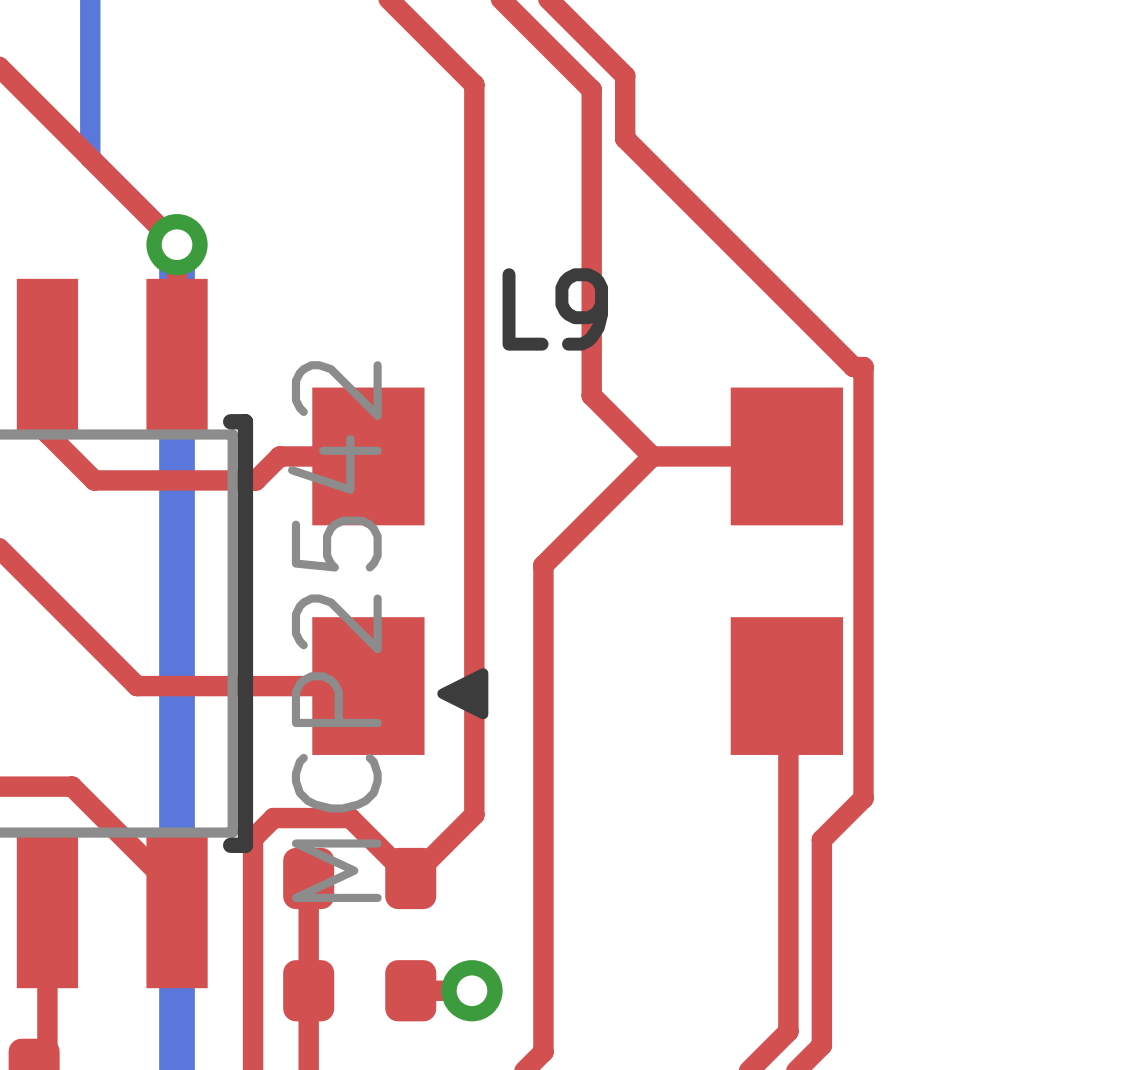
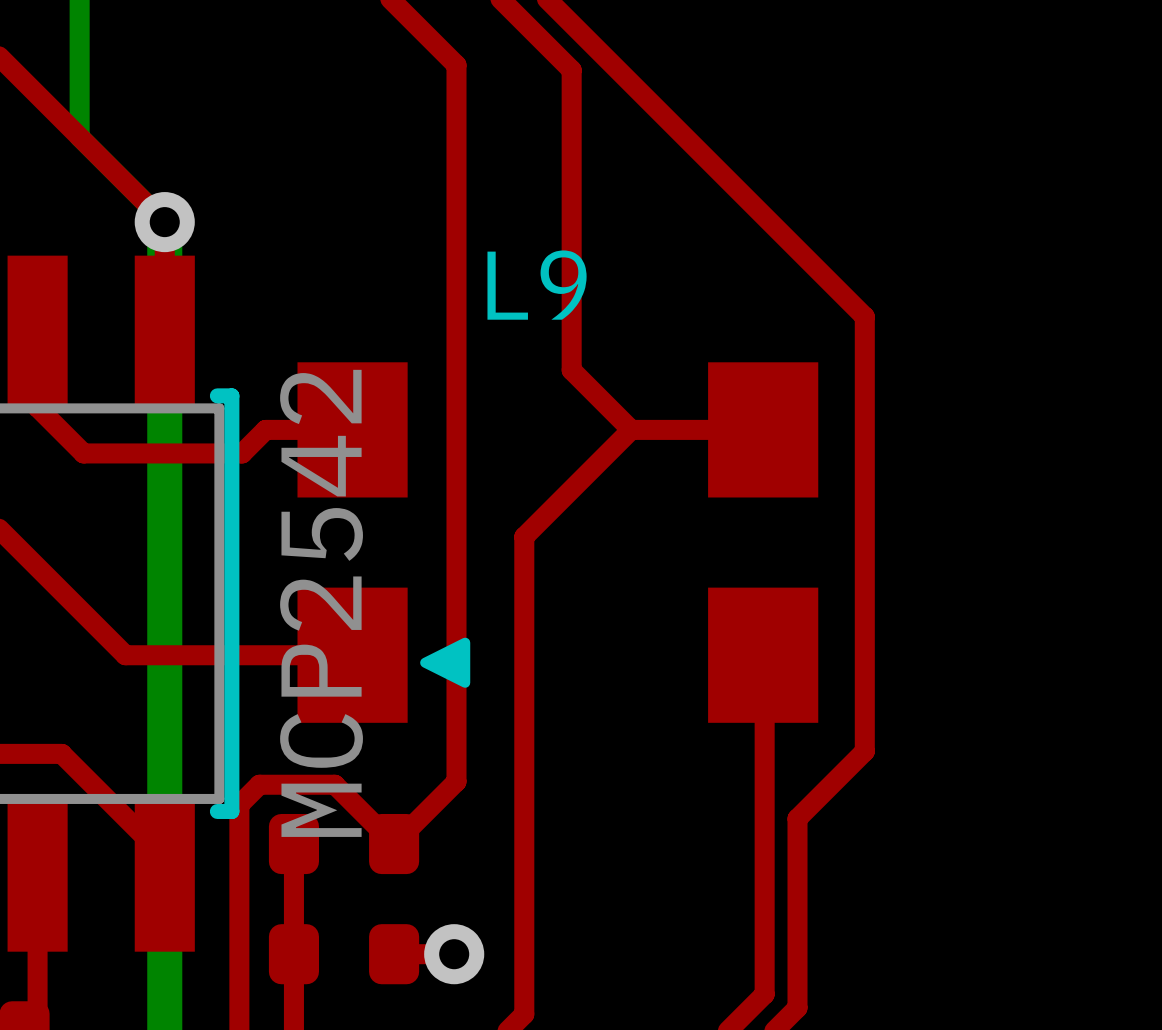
top track: (625, 75) (625, 138) (853, 367) (863, 367) (863, 798) (821, 839) (821, 852) -> (604, 56) (864, 316) (864, 751) (797, 818)

